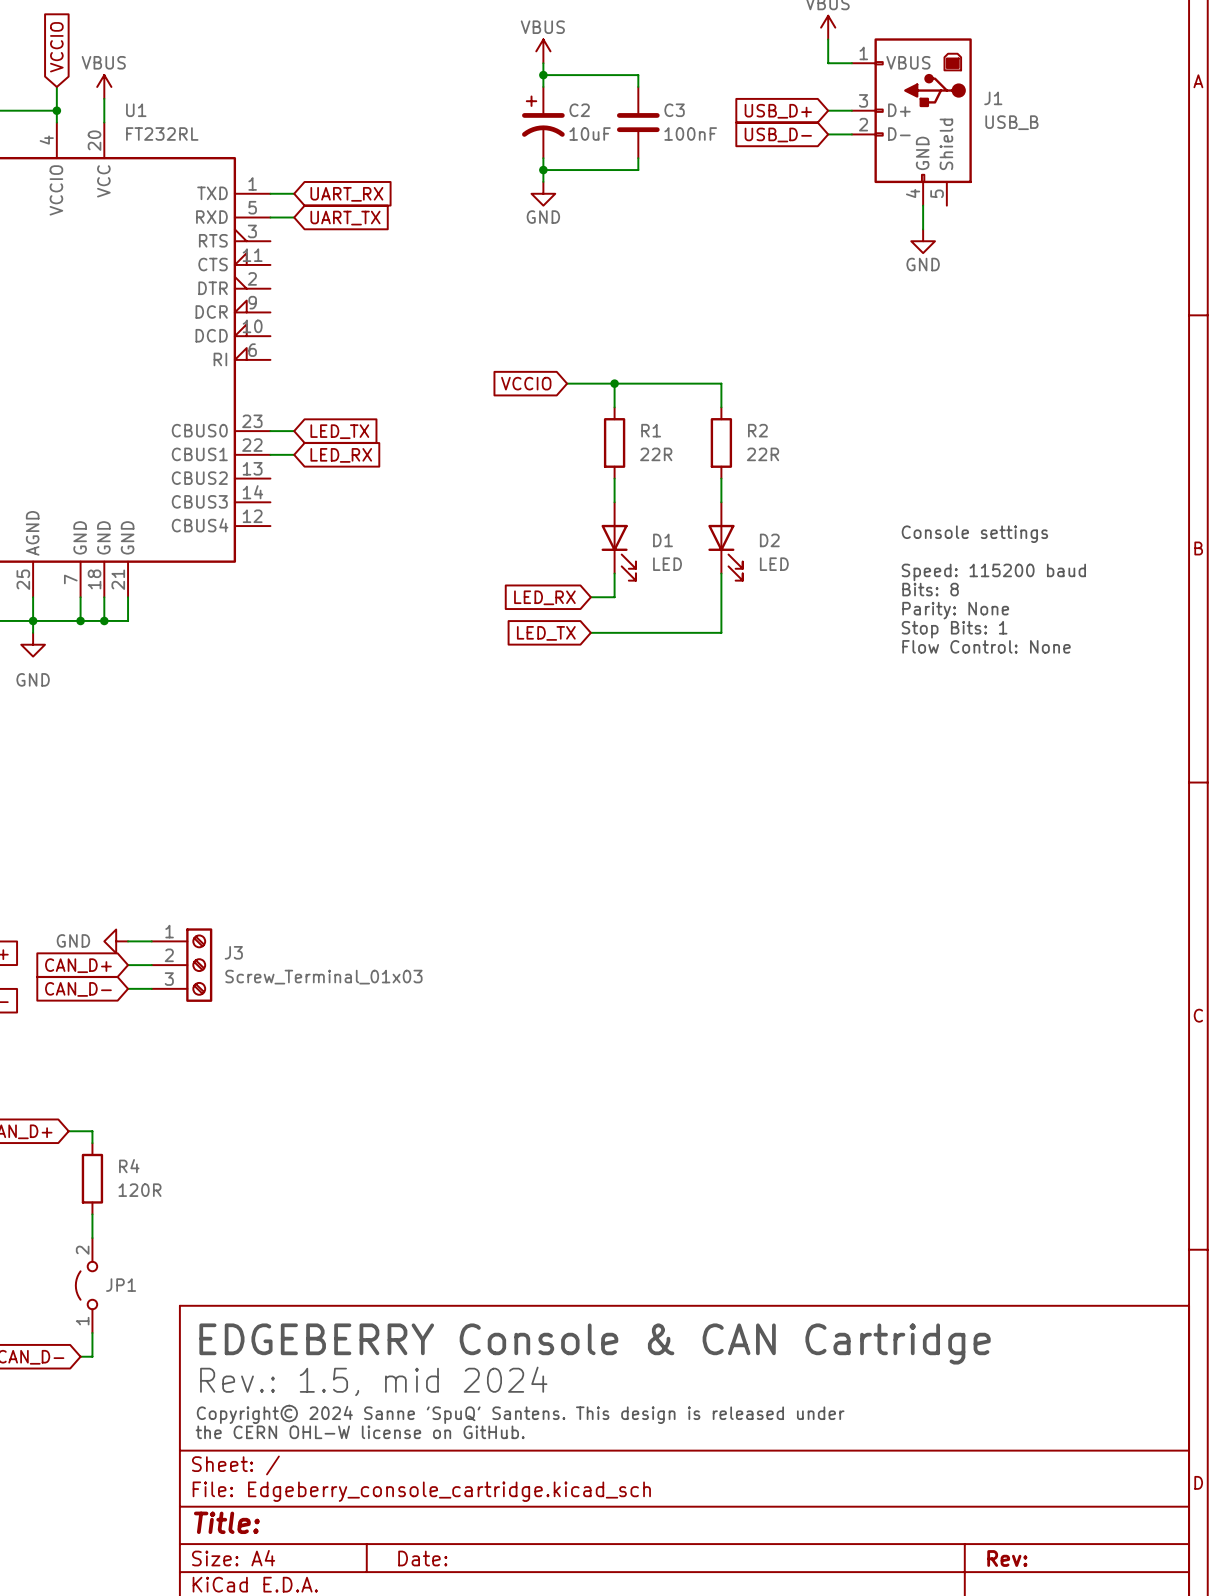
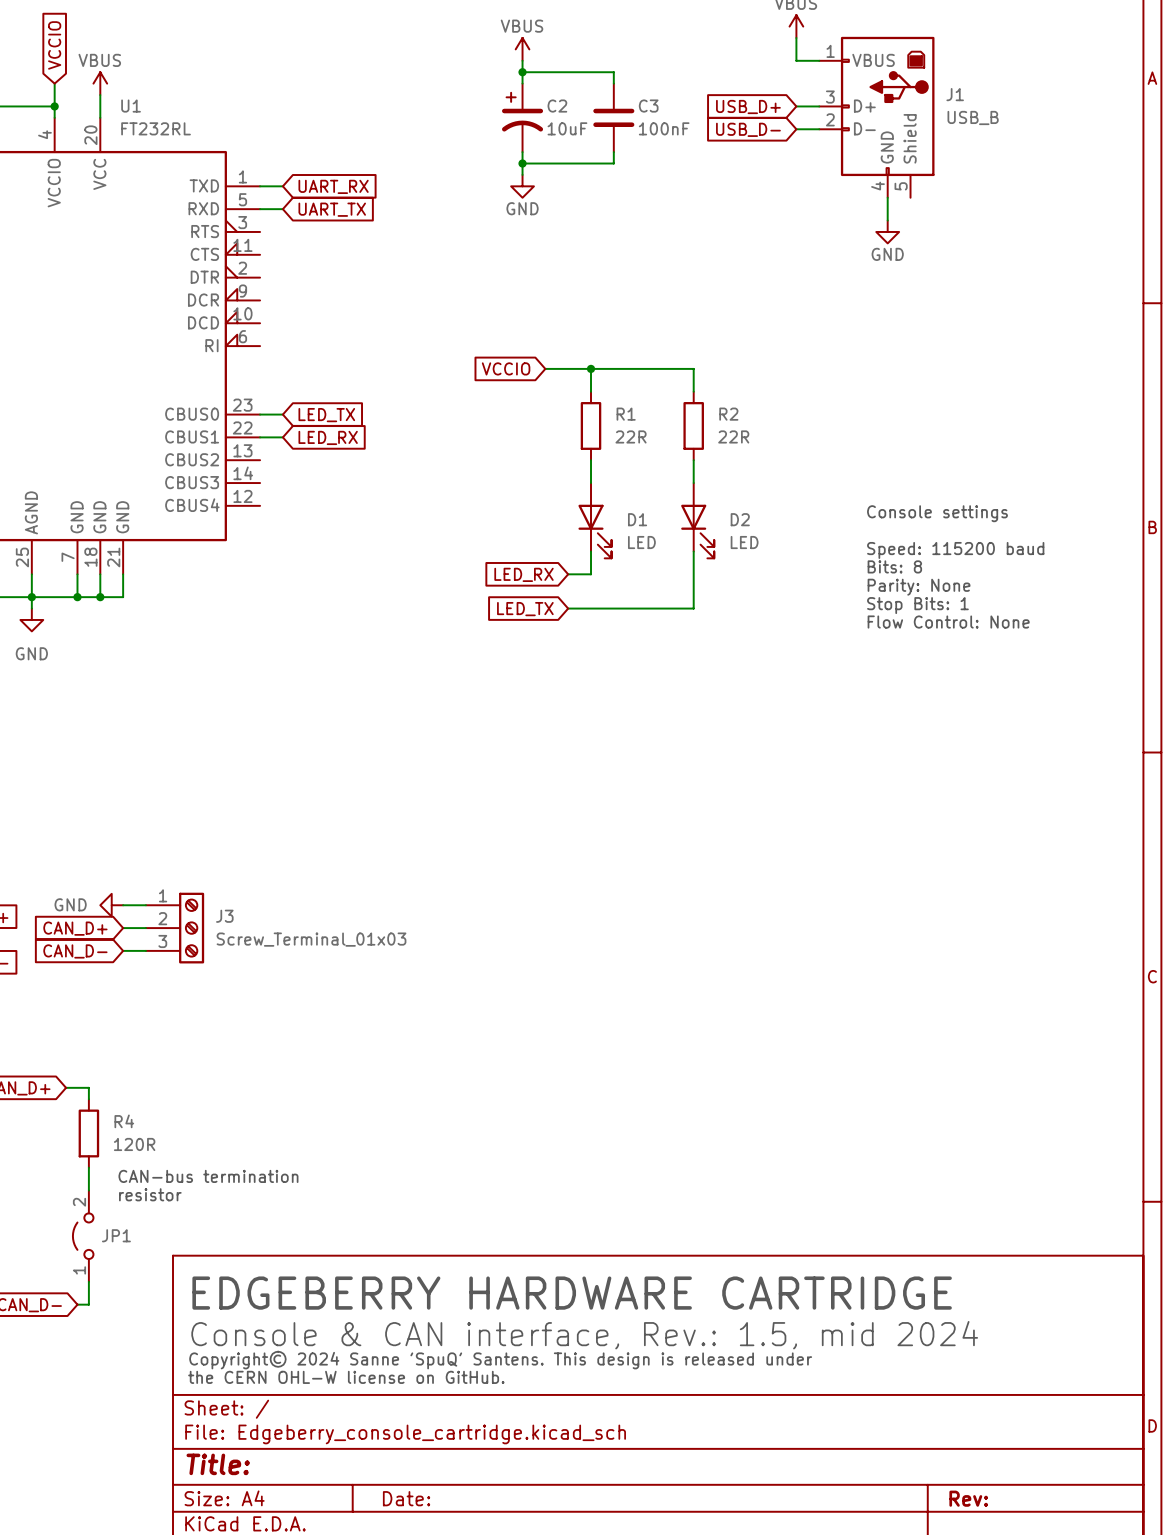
text: none -> CAN-bus termination (208, 1176)
text: none -> resistor (150, 1194)
text: EDGEBERRY Console & CAN Cartridge (595, 1343) -> EDGEBERRY HARDWARE CARTRIDGE (572, 1293)
text: Rev.: 1.5, mid 2024 (373, 1381) -> Console & CAN interface, Rev.: 1.5, mid 2024 (584, 1335)

